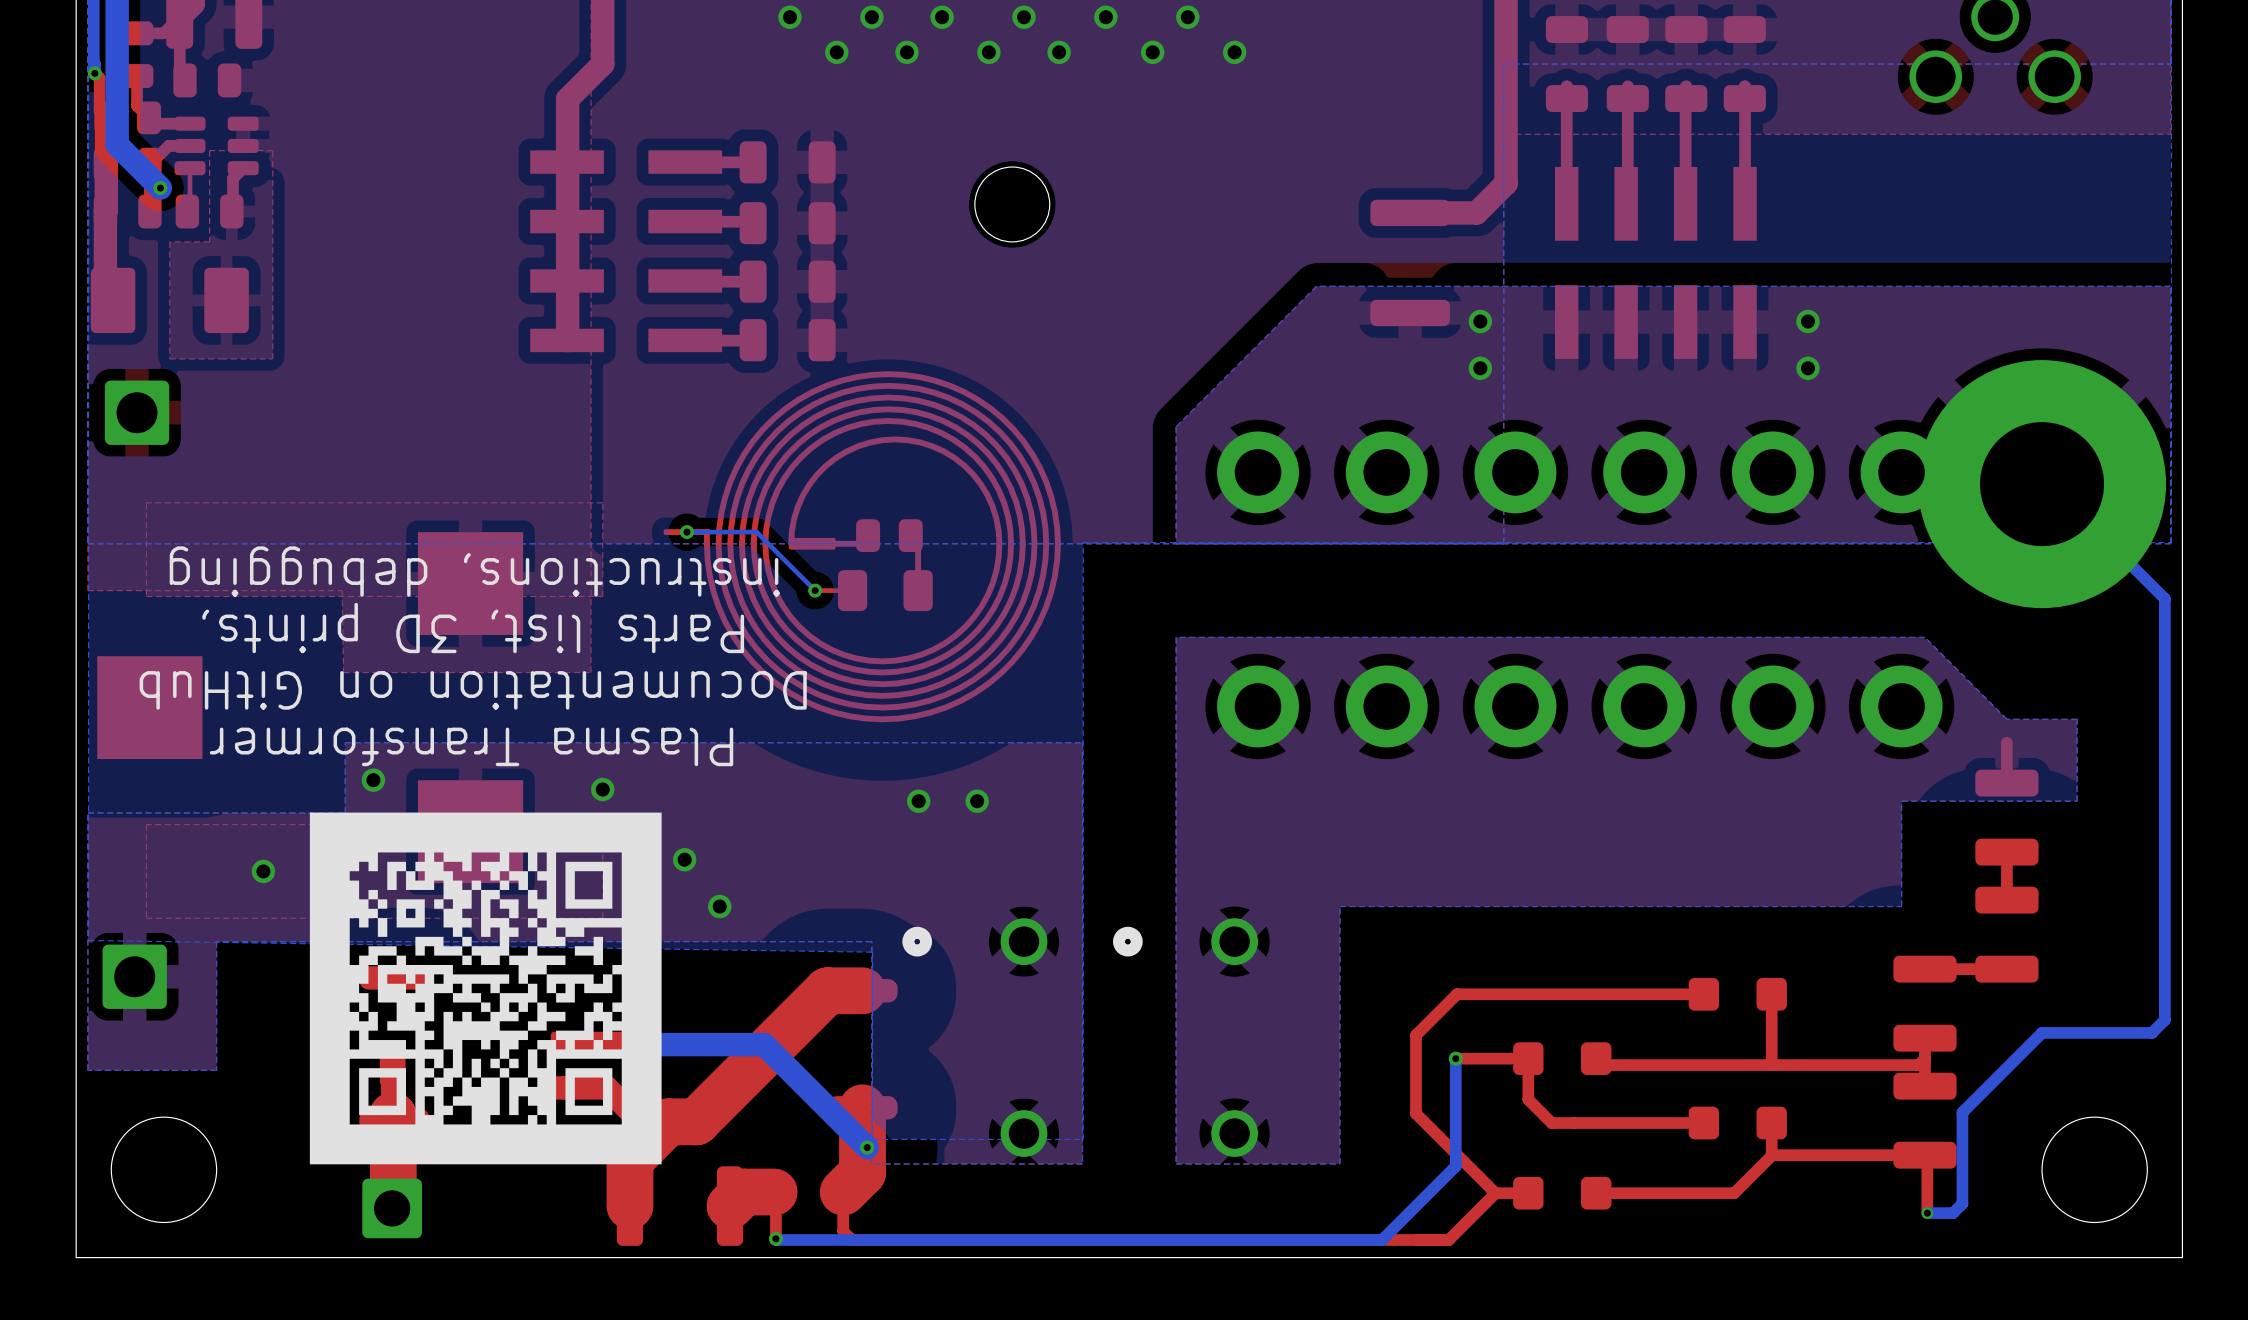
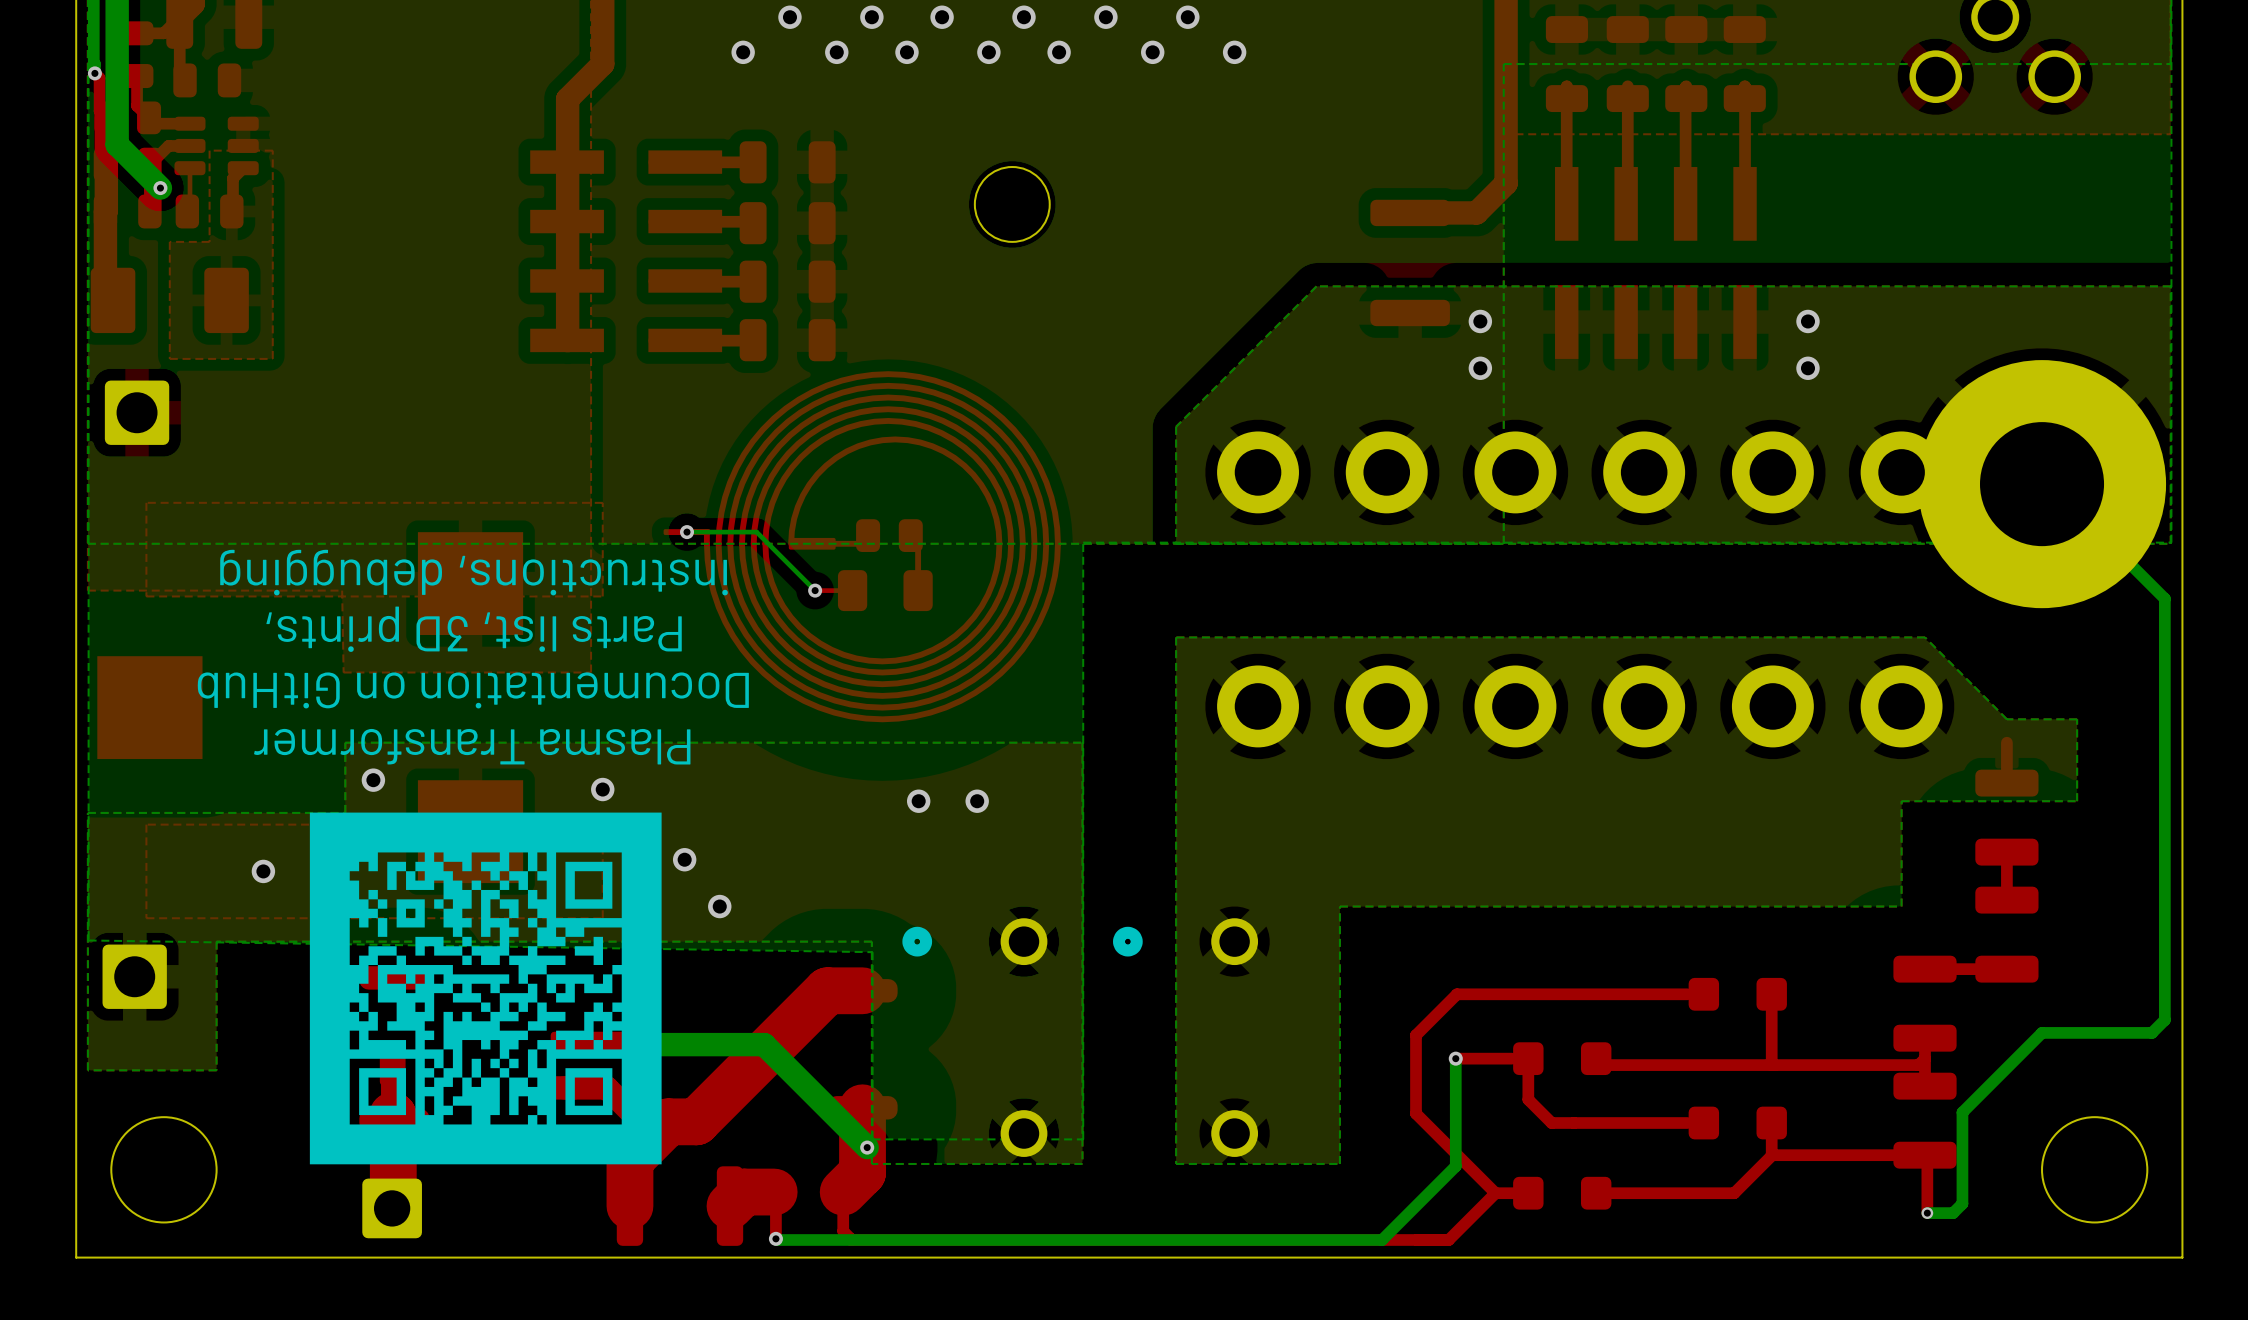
via: none -> (743, 52)

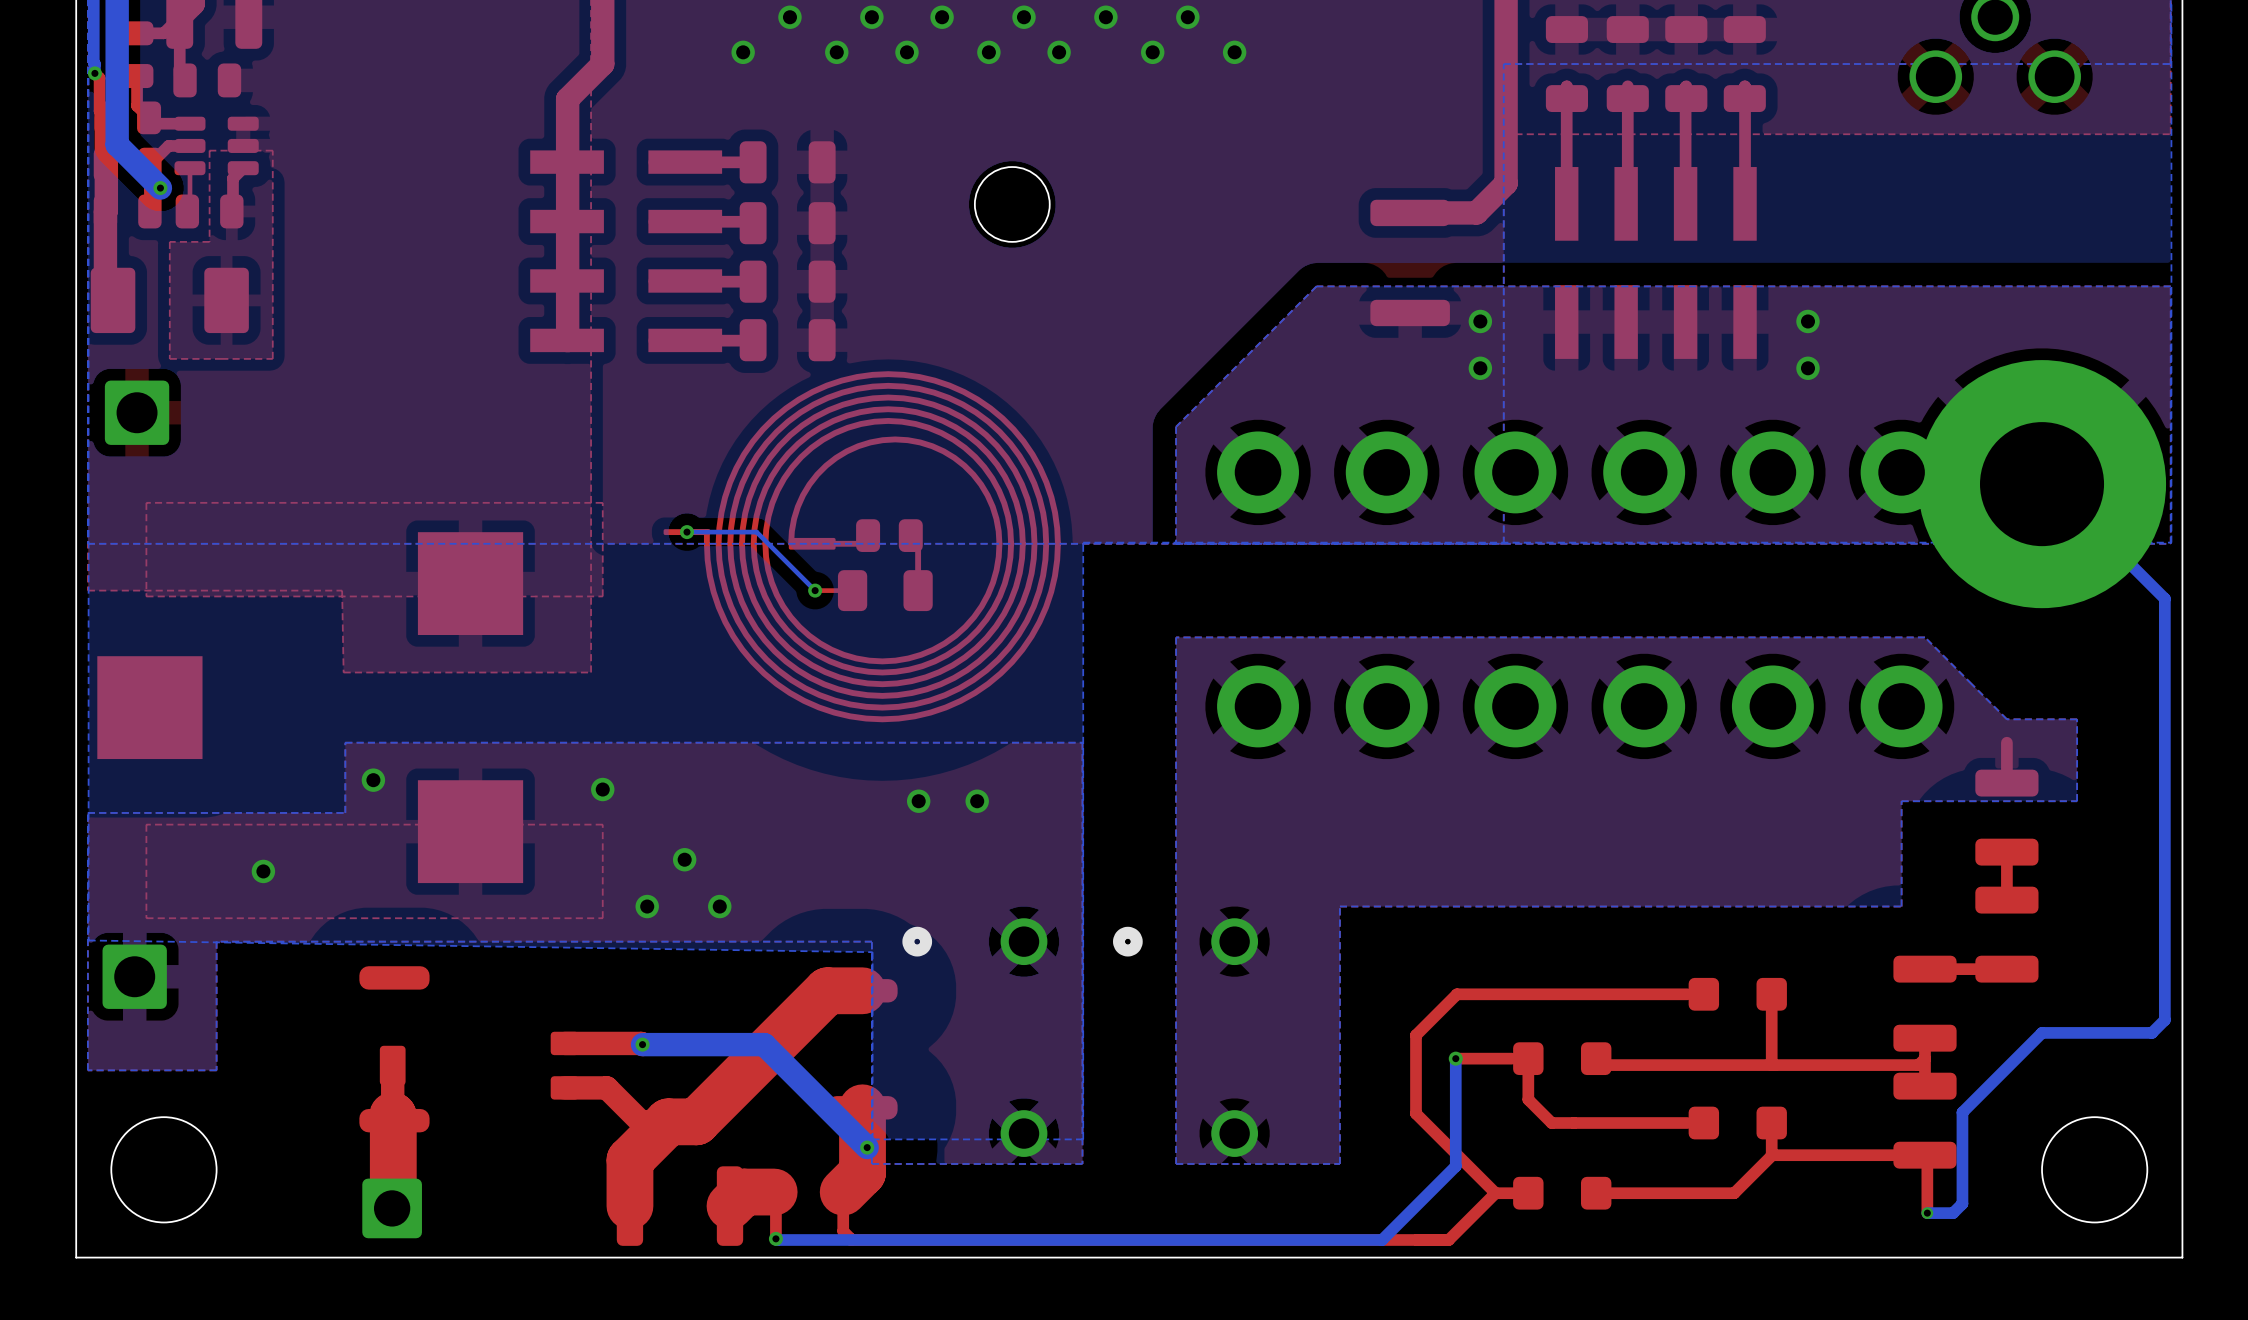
text: instructions, debugging (474, 572) -> none
text: Parts list, 3D prints, (474, 629) -> none
text: Documentation on GitHub (473, 690) -> none
text: Plasma Transformer (472, 746) -> none
drawing: [309, 812, 662, 1165] -> none

